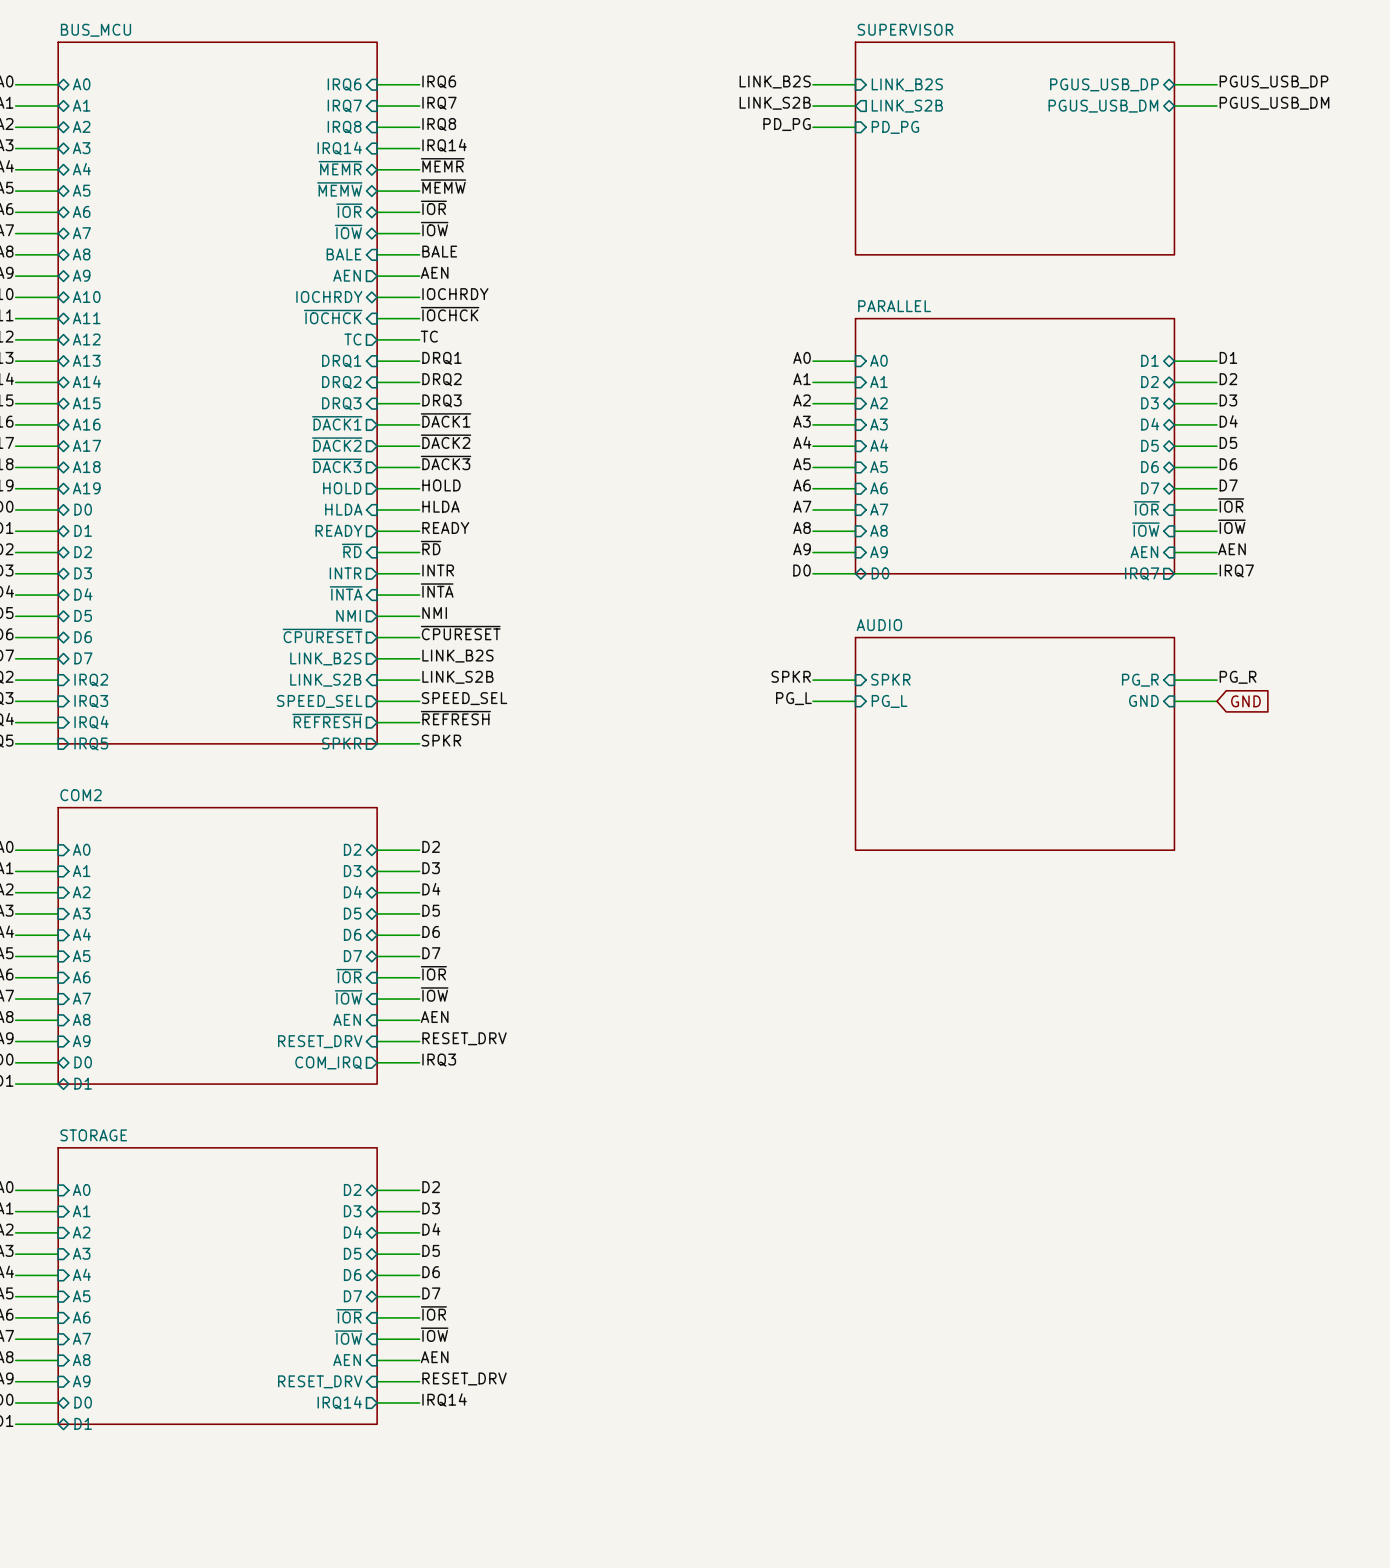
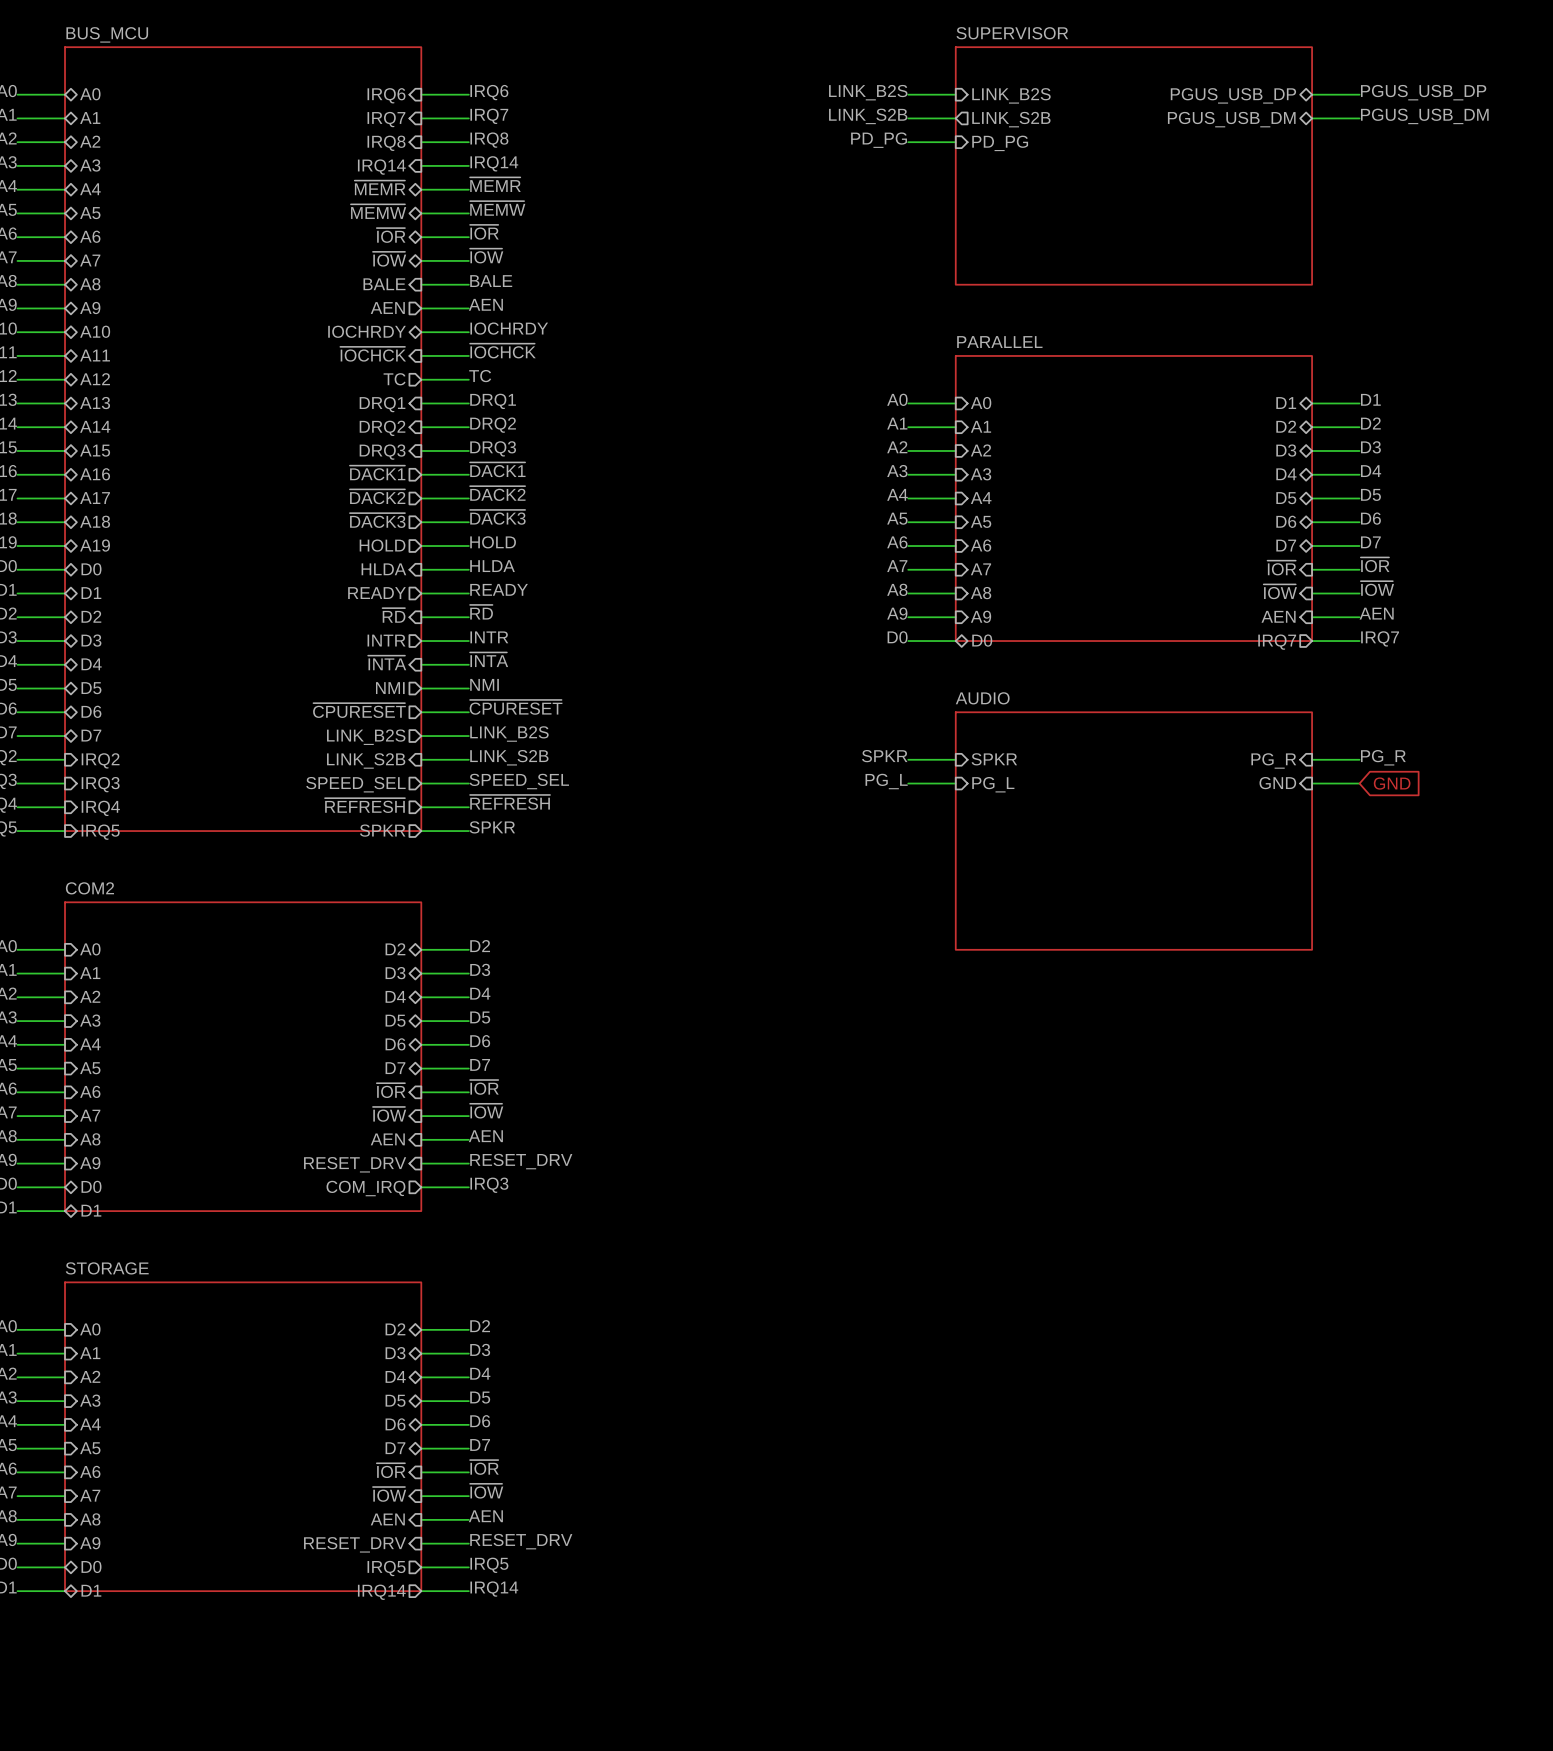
label: IRQ14 (444, 1399) -> IRQ5 (489, 1565)
sheet pin: IRQ14 (339, 1402) -> IRQ5 (386, 1568)
label: none -> IRQ14 (494, 1589)
sheet pin: none -> IRQ14 (381, 1592)
wire: none -> (421, 1591) (468, 1591)

